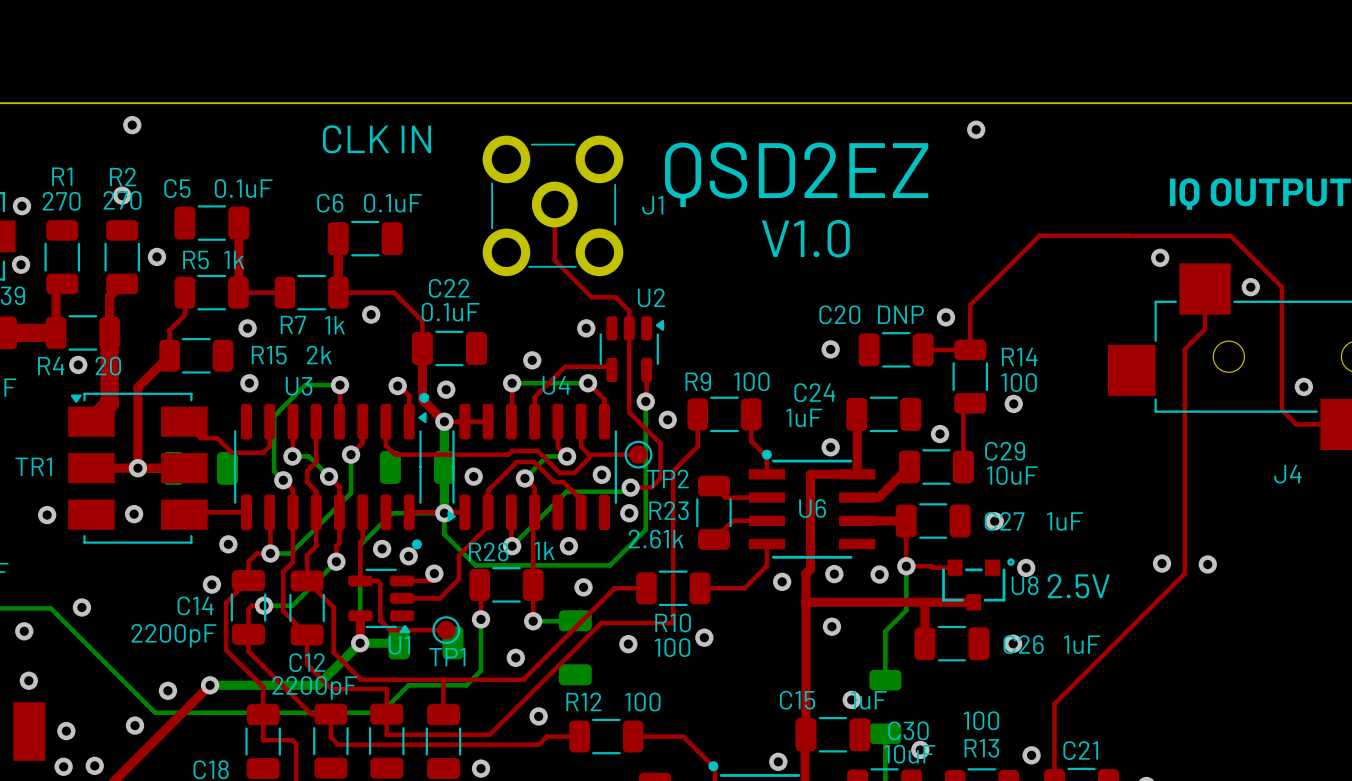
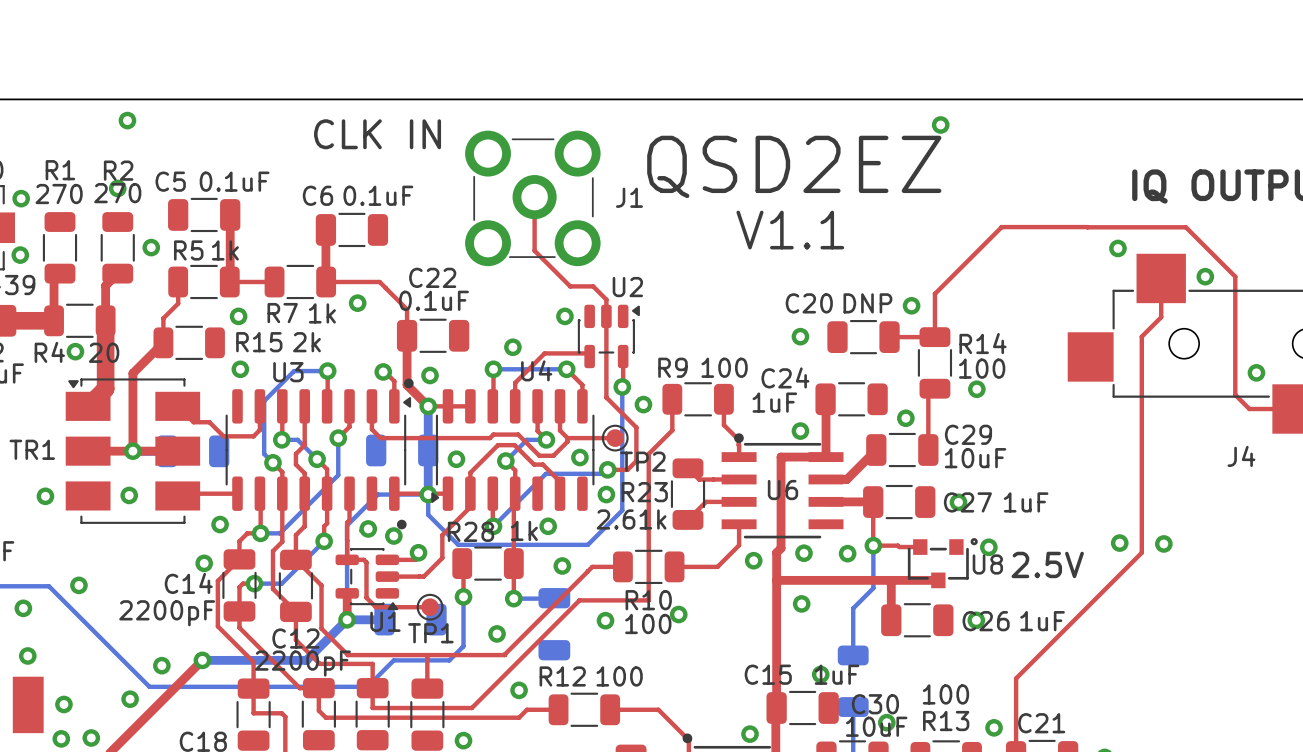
text: V1.0 (805, 238) -> V1.1 (790, 230)
U2 footprint: [599, 316, 665, 383] -> [577, 304, 640, 369]
U1 footprint: [348, 568, 415, 634] -> [335, 548, 400, 611]

